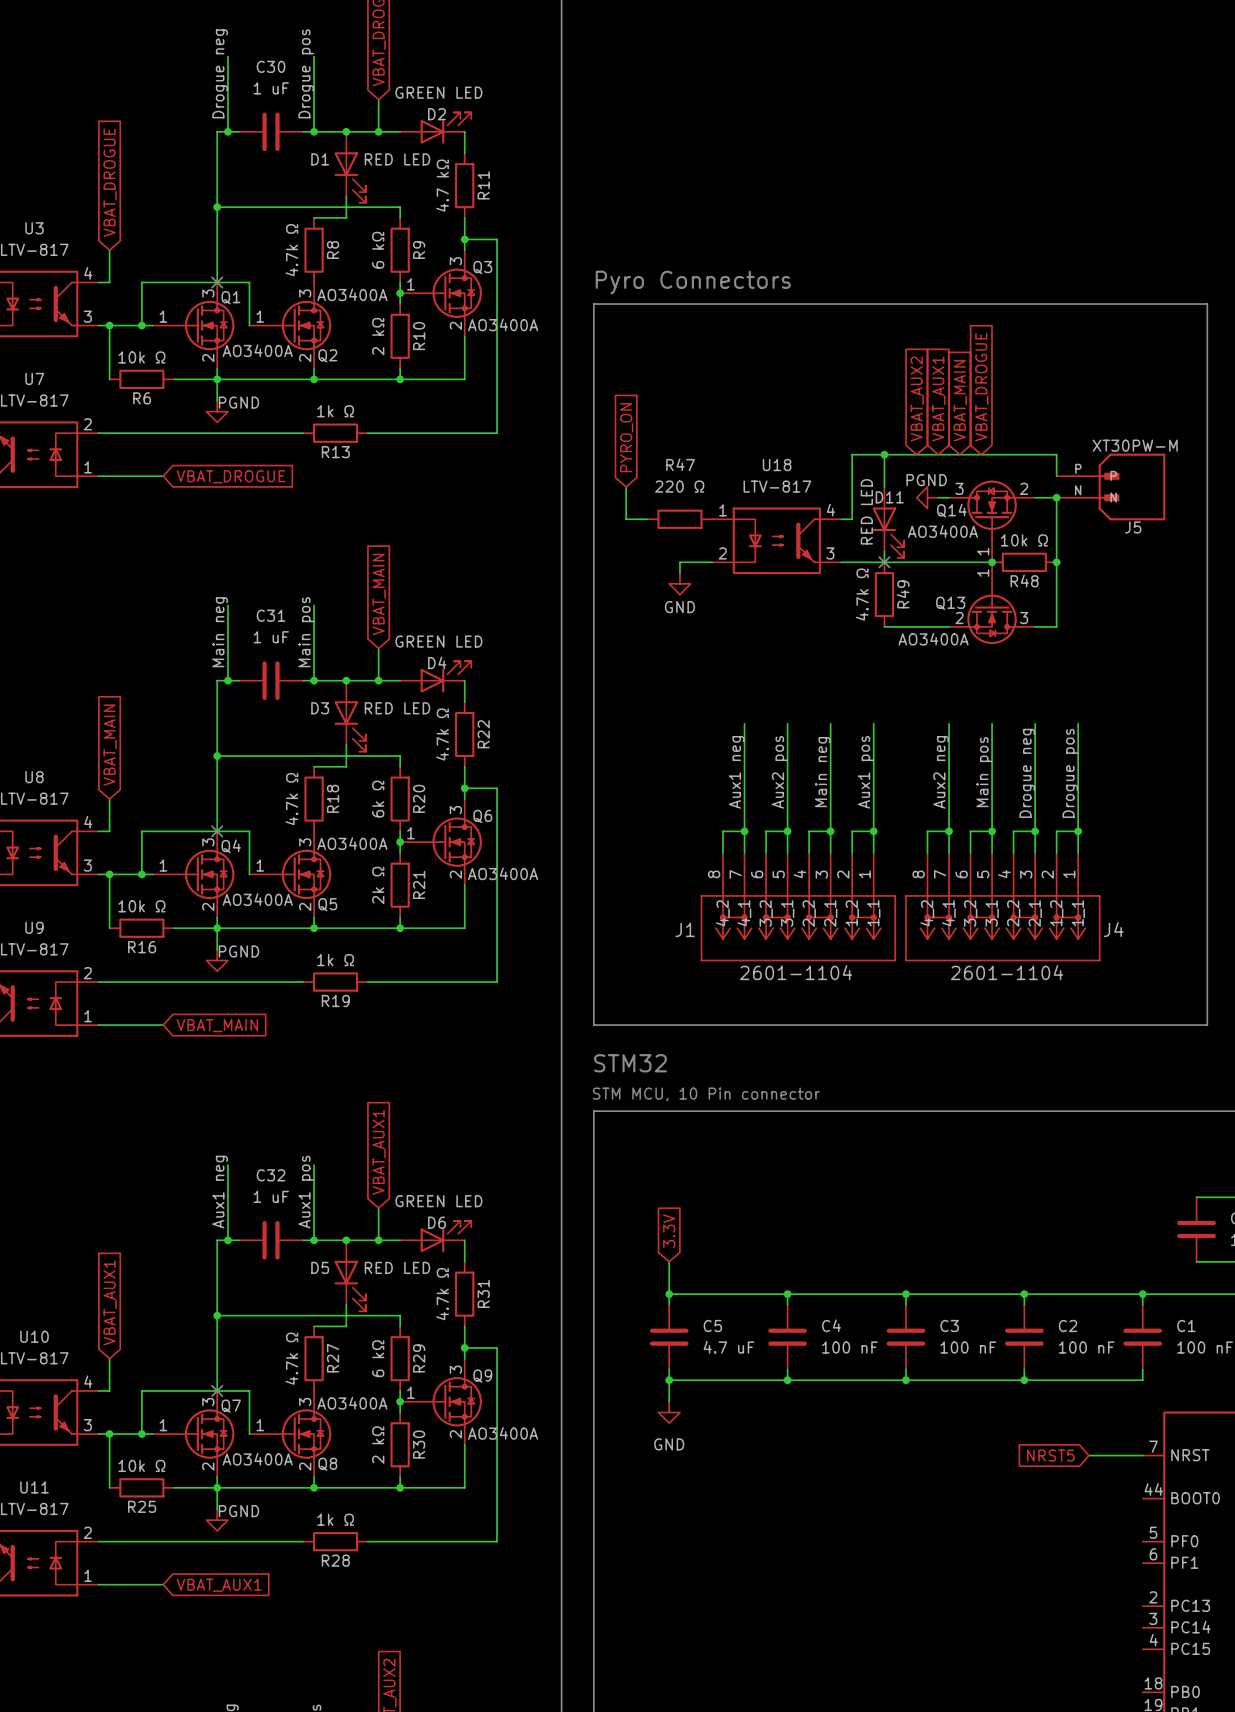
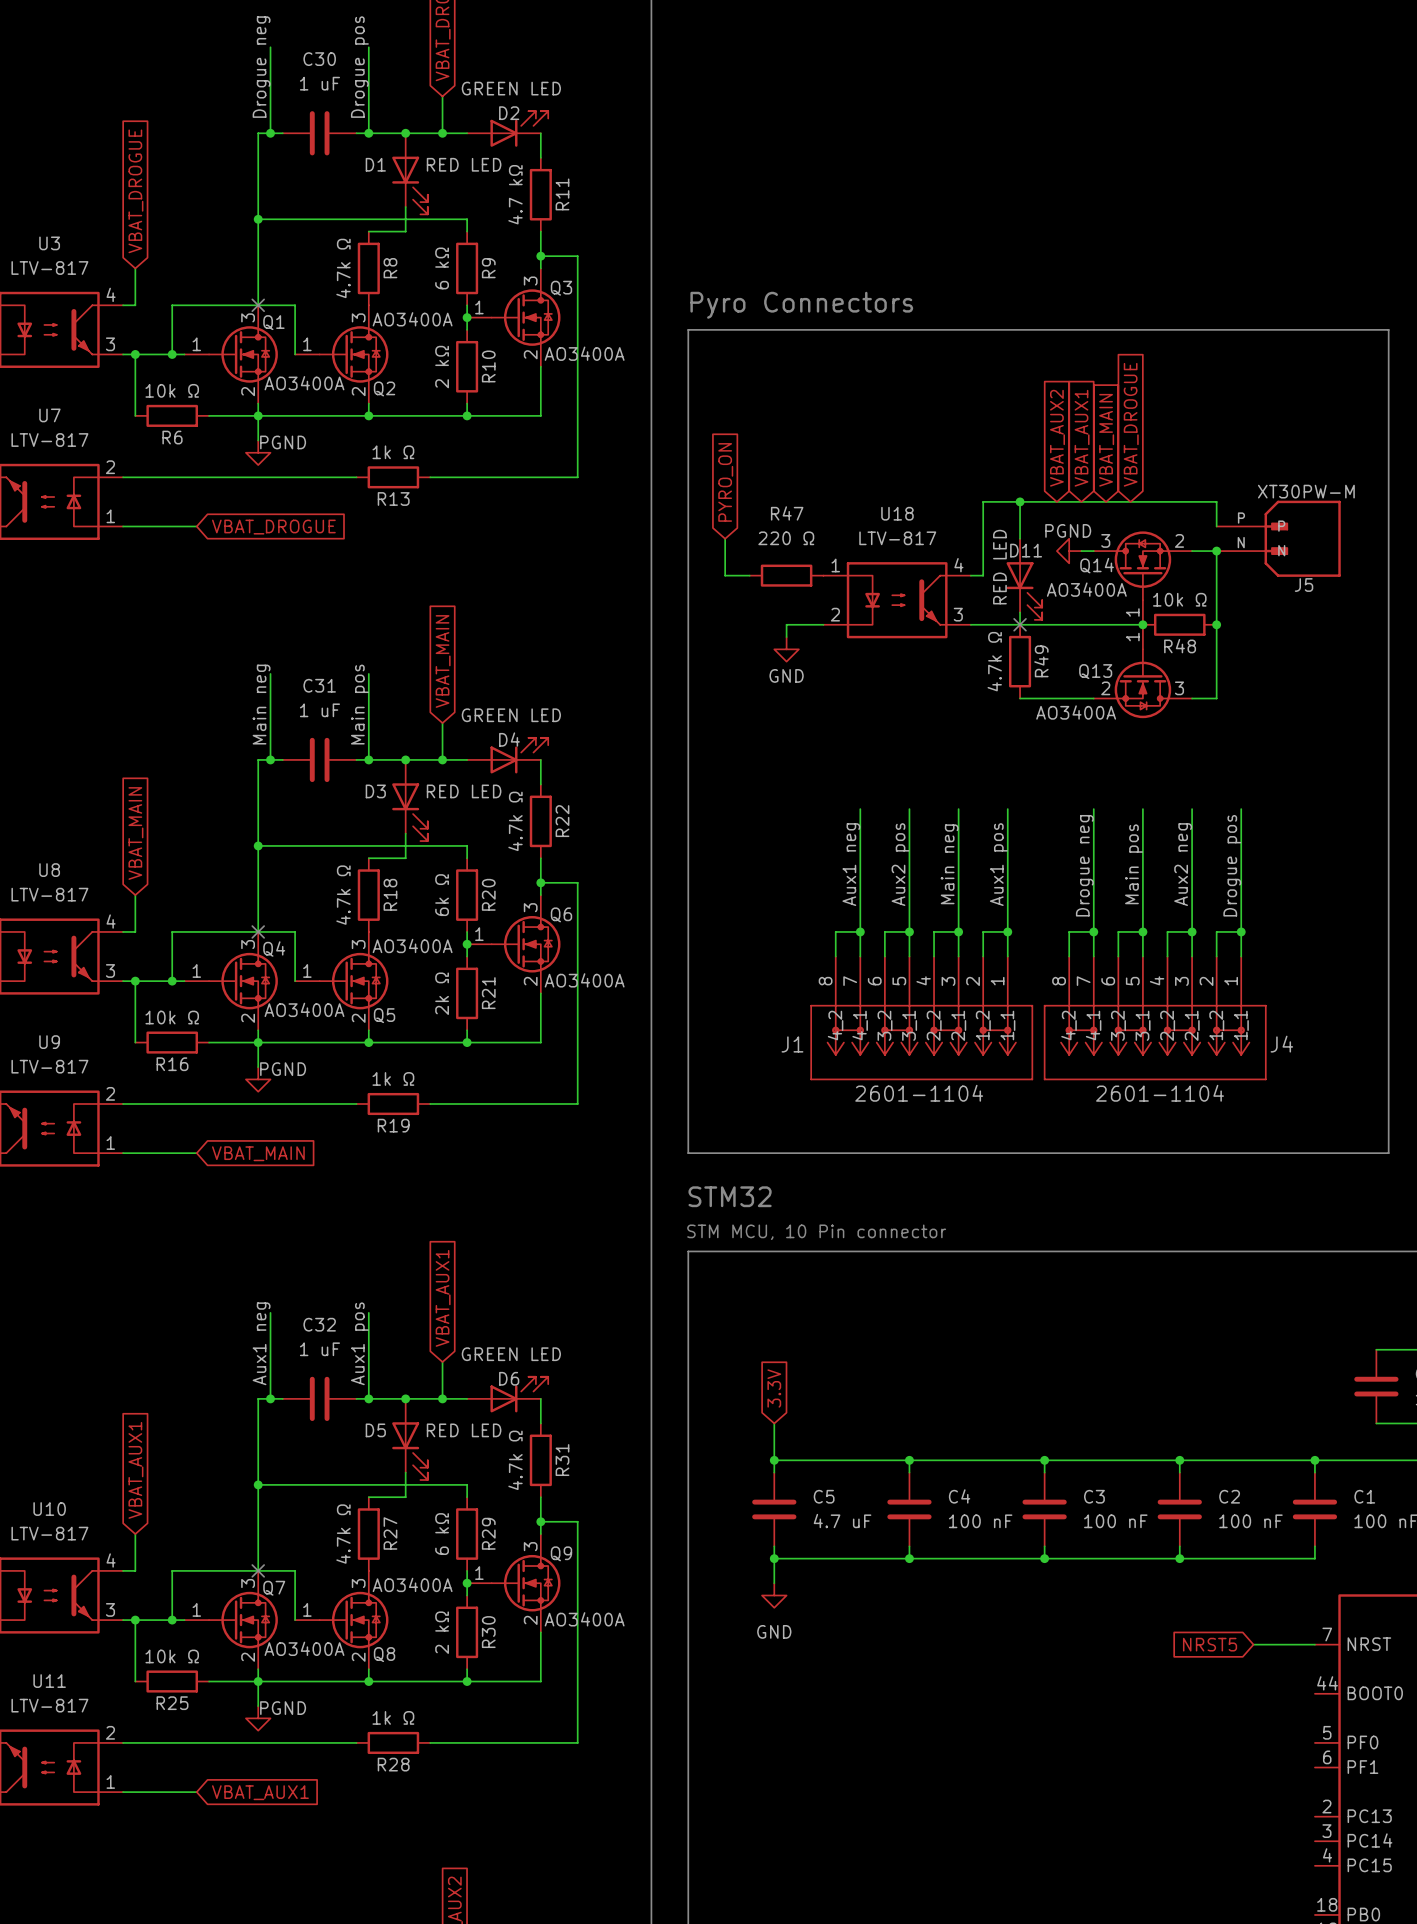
label position: Aux2 neg (941, 772) -> Aux2 neg (1183, 864)
label position: Drogue neg (1027, 773) -> Drogue neg (1084, 865)

